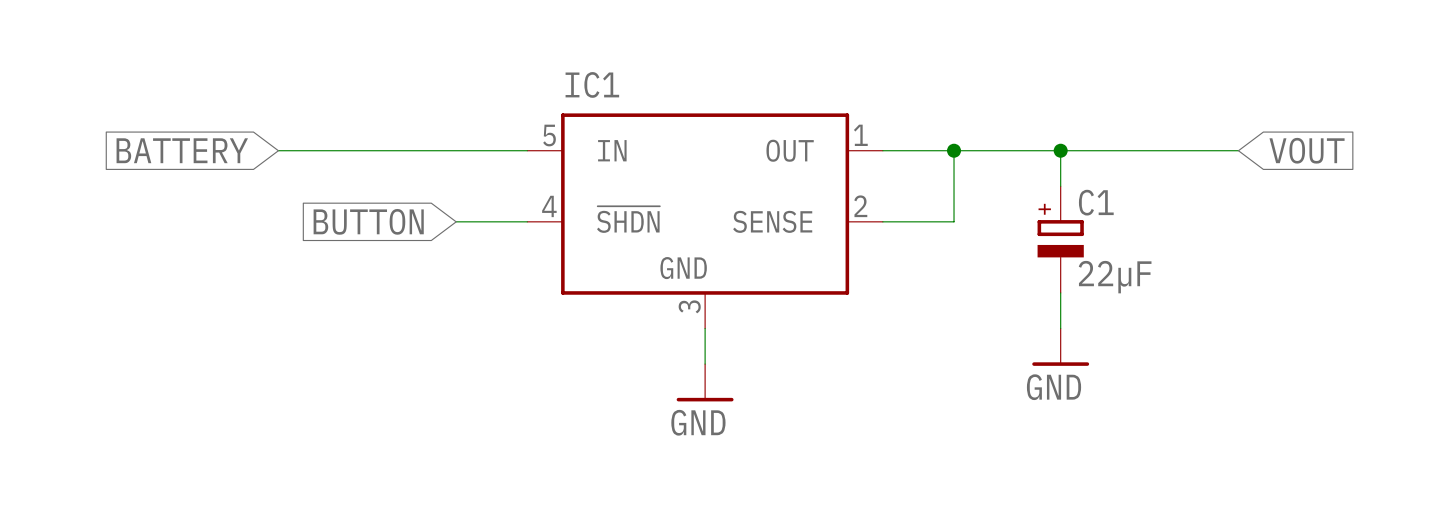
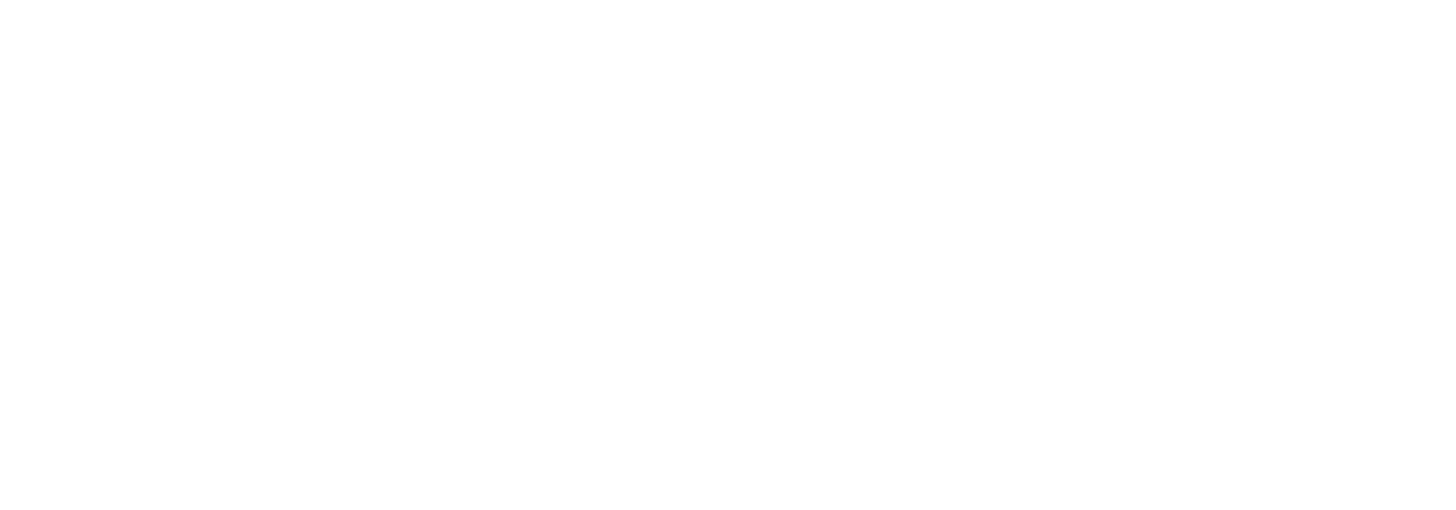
global label: BATTERY (182, 150) -> none
wire: (278, 150) (527, 150) -> none
wire: (882, 150) (1238, 150) -> none
wire: (954, 150) (954, 221) (882, 221) -> none
junction: (954, 150) -> none
wire: (1060, 150) (1060, 186) -> none
junction: (1060, 150) -> none
global label: VOUT (1307, 150) -> none
IC1: (705, 220) -> none
global label: BUTTON (368, 221) -> none
wire: (456, 221) (527, 221) -> none
C1: 22µF (1060, 239) -> none
wire: (1060, 292) (1060, 328) -> none
wire: (705, 328) (705, 364) -> none
power symbol: GND (1060, 347) -> none
power symbol: GND (705, 382) -> none

